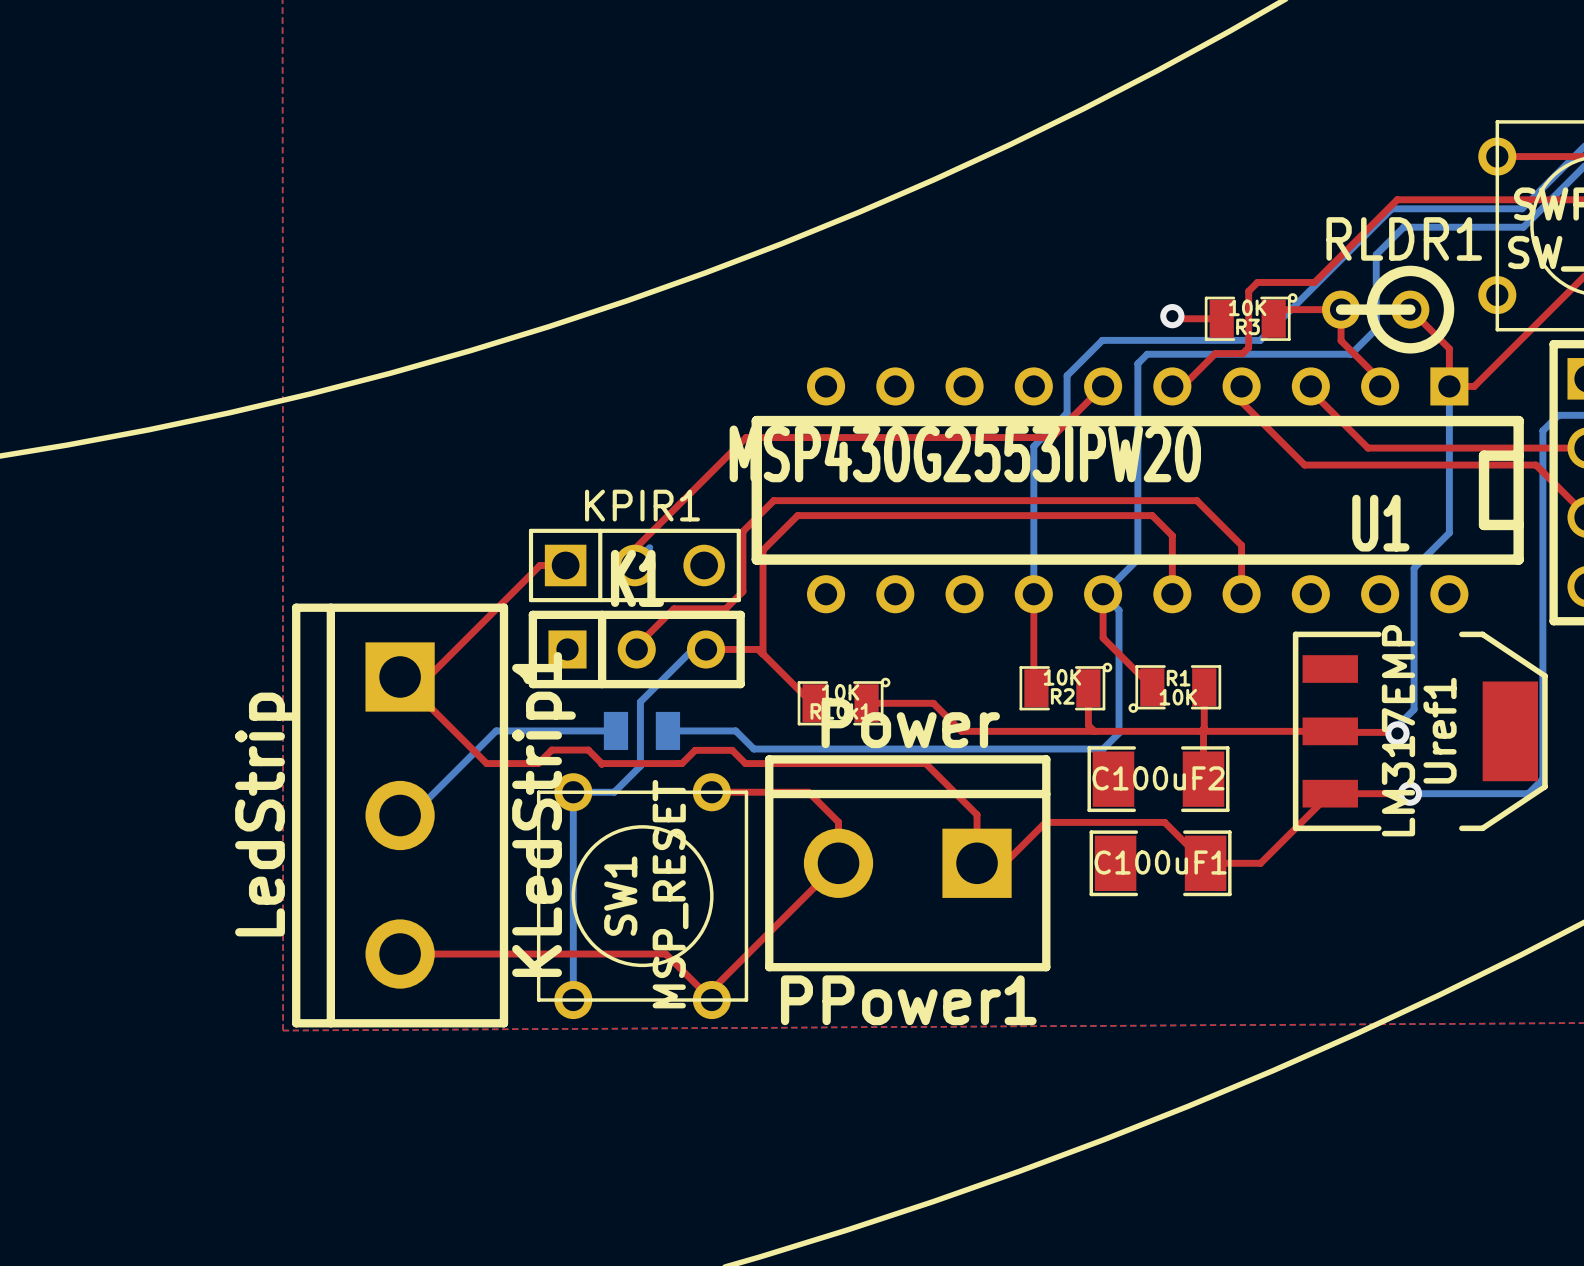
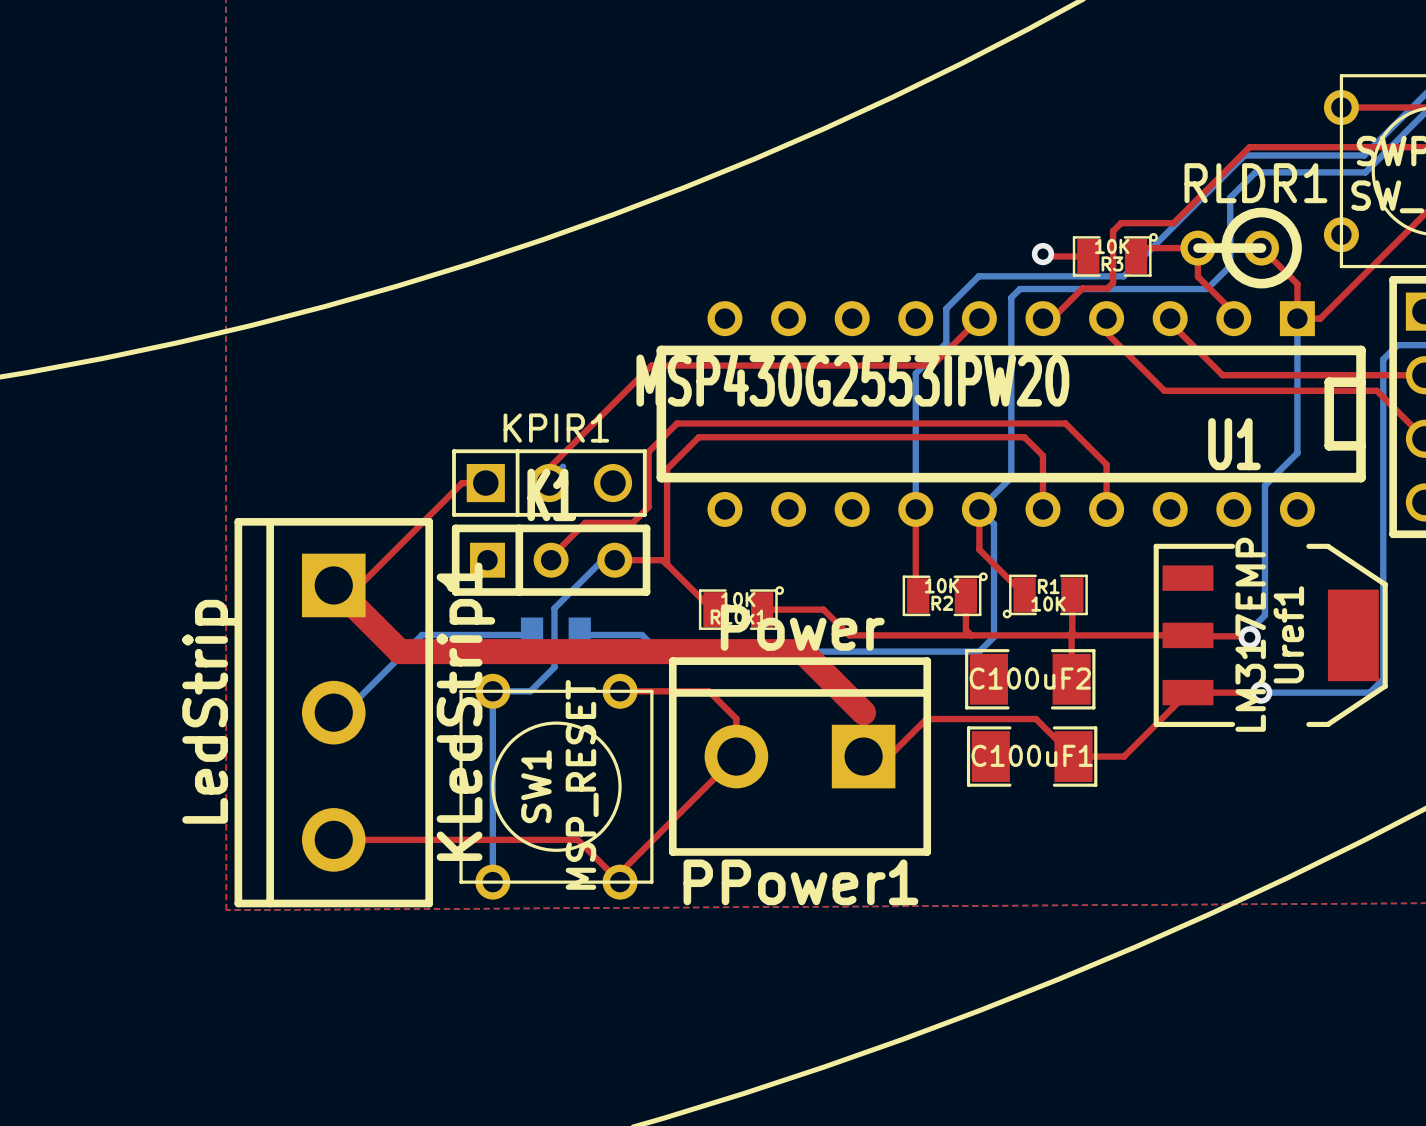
top track width: thin (400, 676) (472, 749) -> thick (333, 585) (399, 651)
top track: (472, 749) (486, 763) (538, 763) (551, 750) (588, 750) (601, 764) (681, 763) (695, 750) (732, 750) (745, 763) (925, 763) (977, 815) -> (399, 651) (802, 651) (863, 712)

